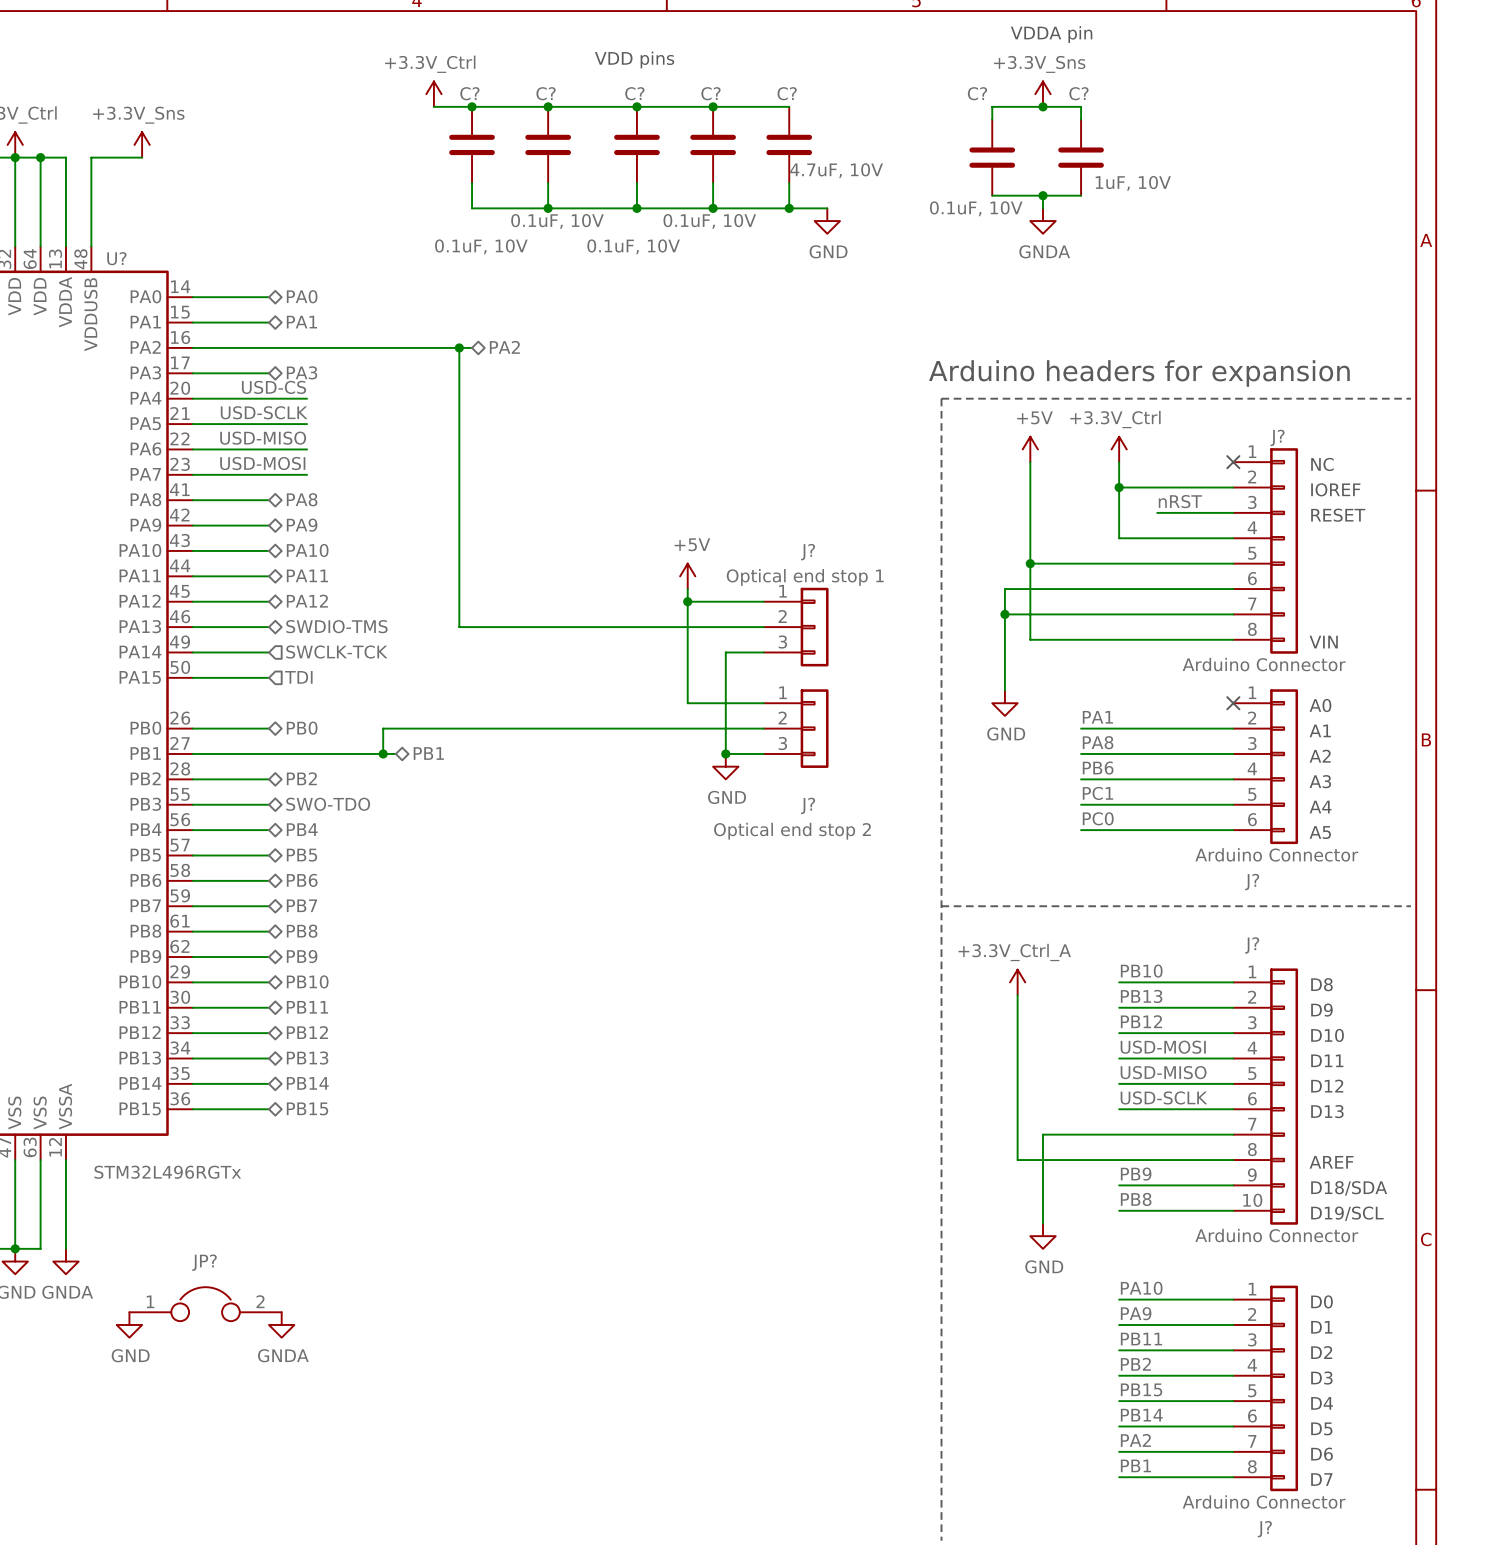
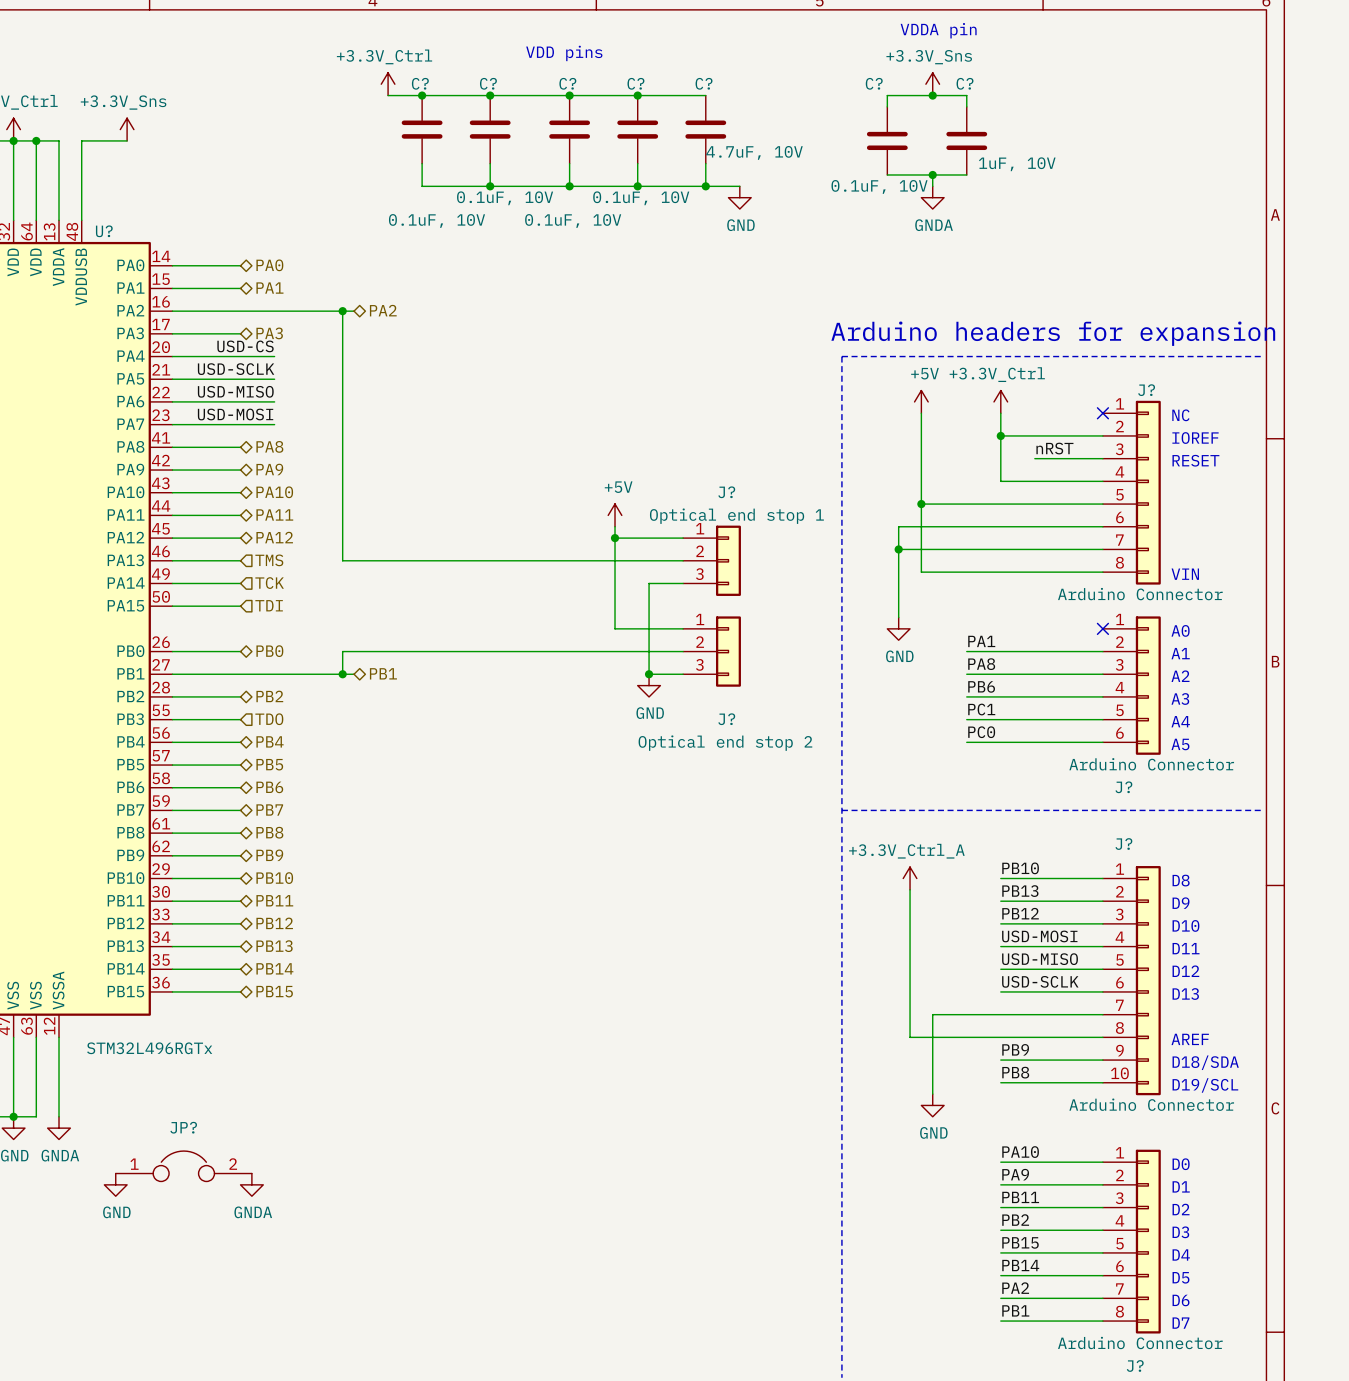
junction: none -> (342, 311)
wire: (395, 347) (472, 347) -> none
wire: (459, 347) (459, 627) -> (342, 311) (342, 560) (410, 560)
junction: (459, 347) -> none
hierarchical label position: PA2 (504, 347) -> PA2 (383, 310)
hierarchical label shape: bidirectional (336, 626) -> input (269, 560)
hierarchical label: SWDIO-TMS (336, 626) -> TMS (269, 560)
hierarchical label: SWCLK-TCK (336, 652) -> TCK (269, 583)
hierarchical label shape: bidirectional (328, 804) -> input (269, 719)
hierarchical label: SWO-TDO (328, 804) -> TDO (269, 719)

